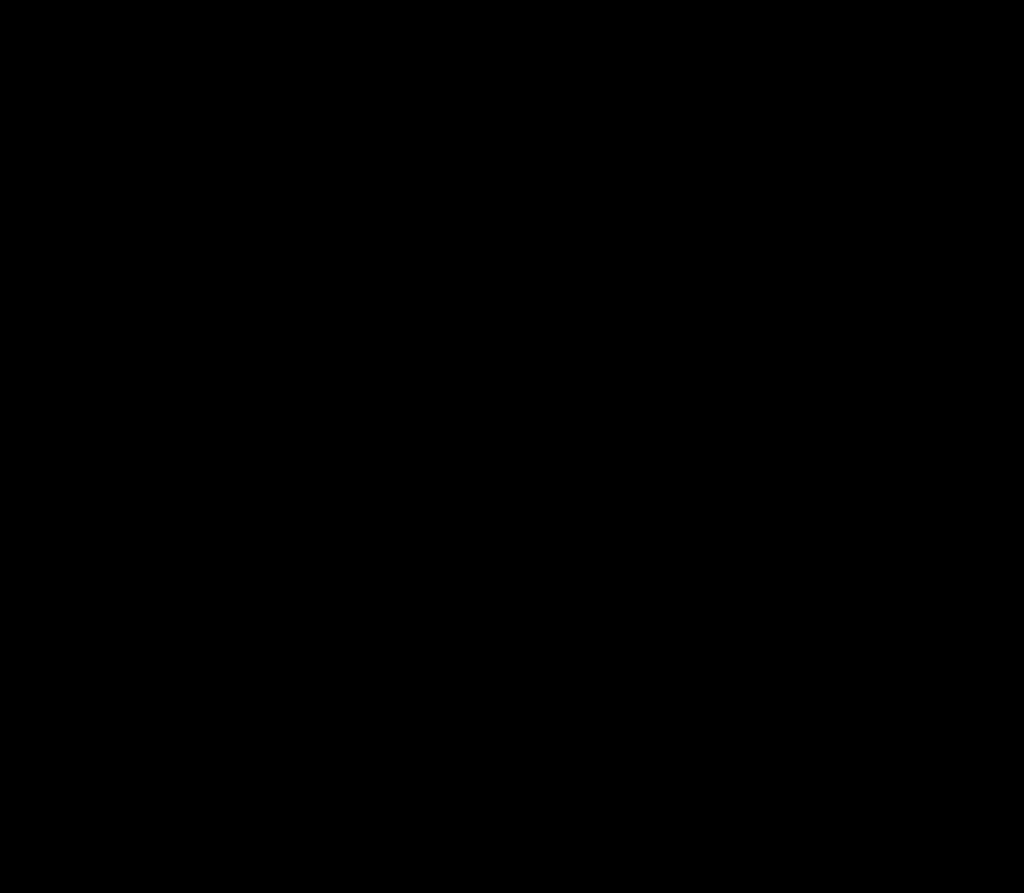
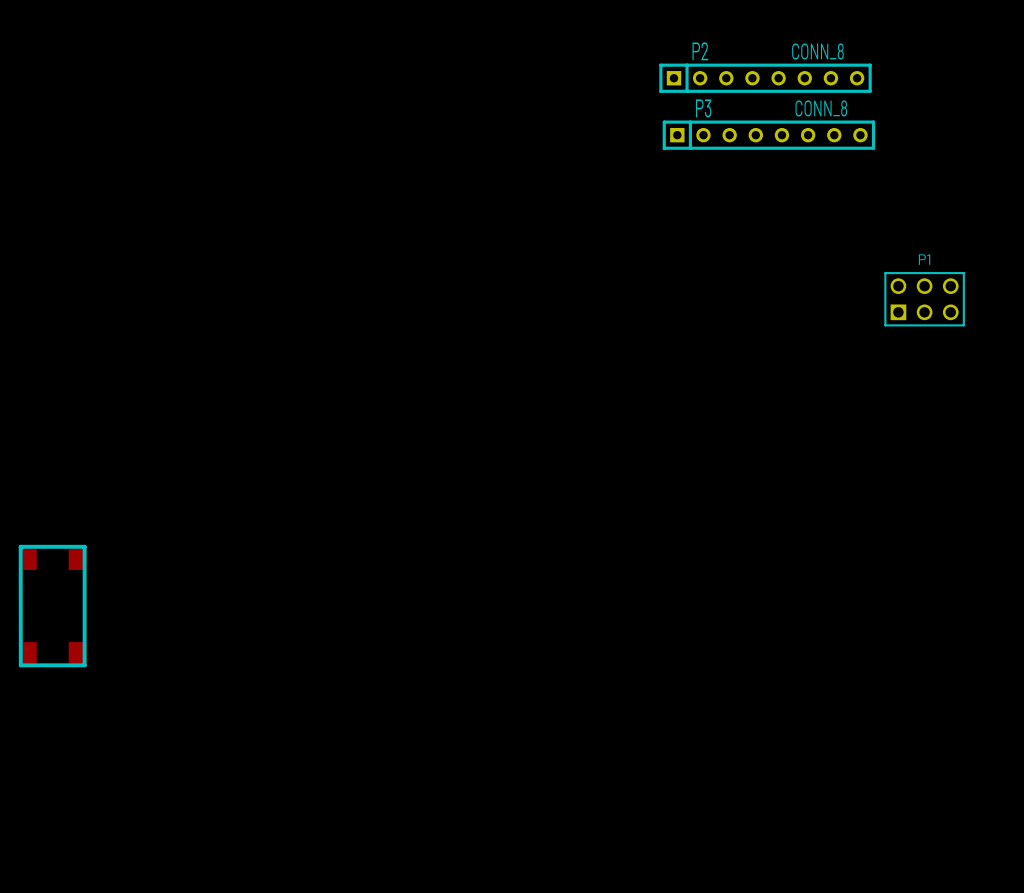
P2: none -> CONN_8 (765, 78)
P3: none -> CONN_8 (768, 135)
P1: none -> (924, 299)
part: none -> (52, 606)

